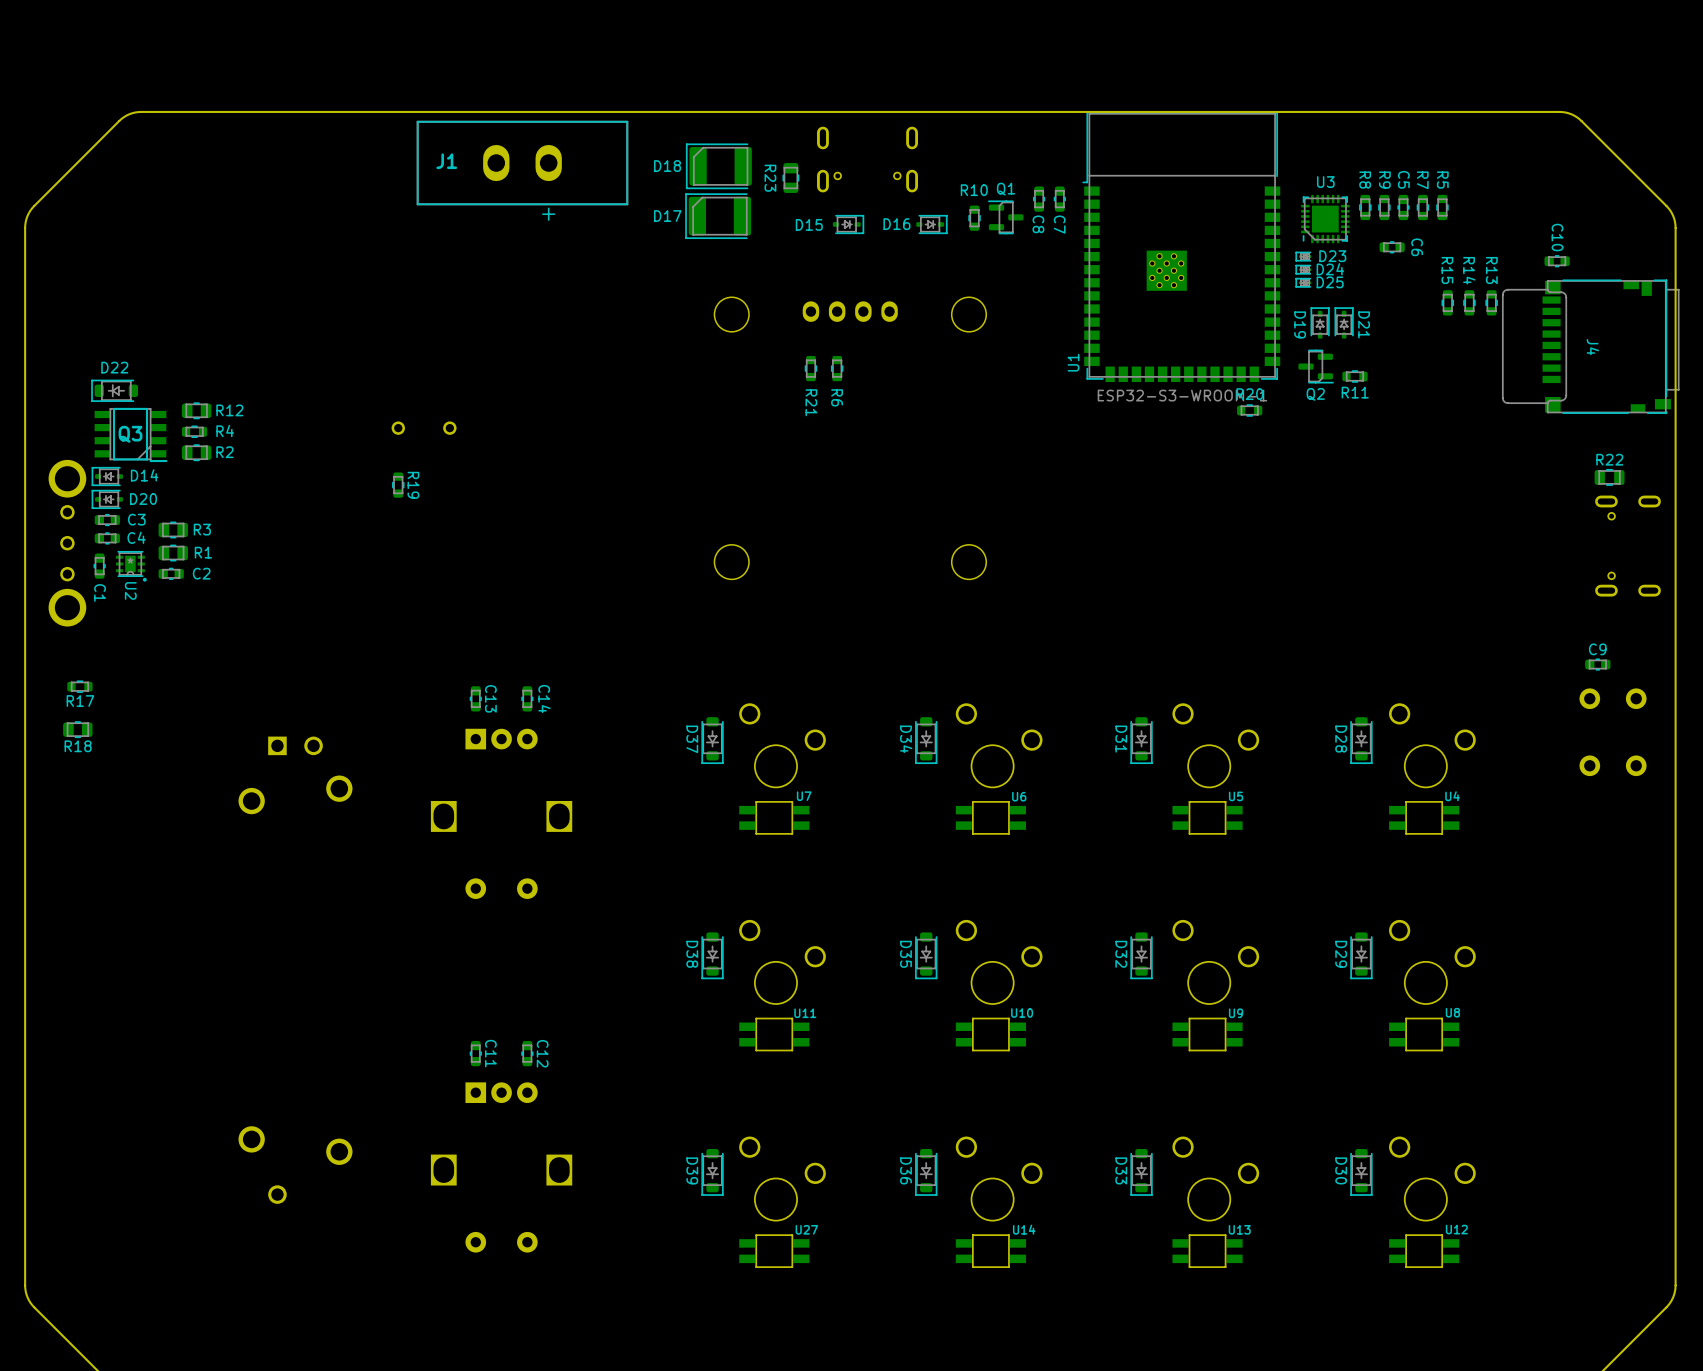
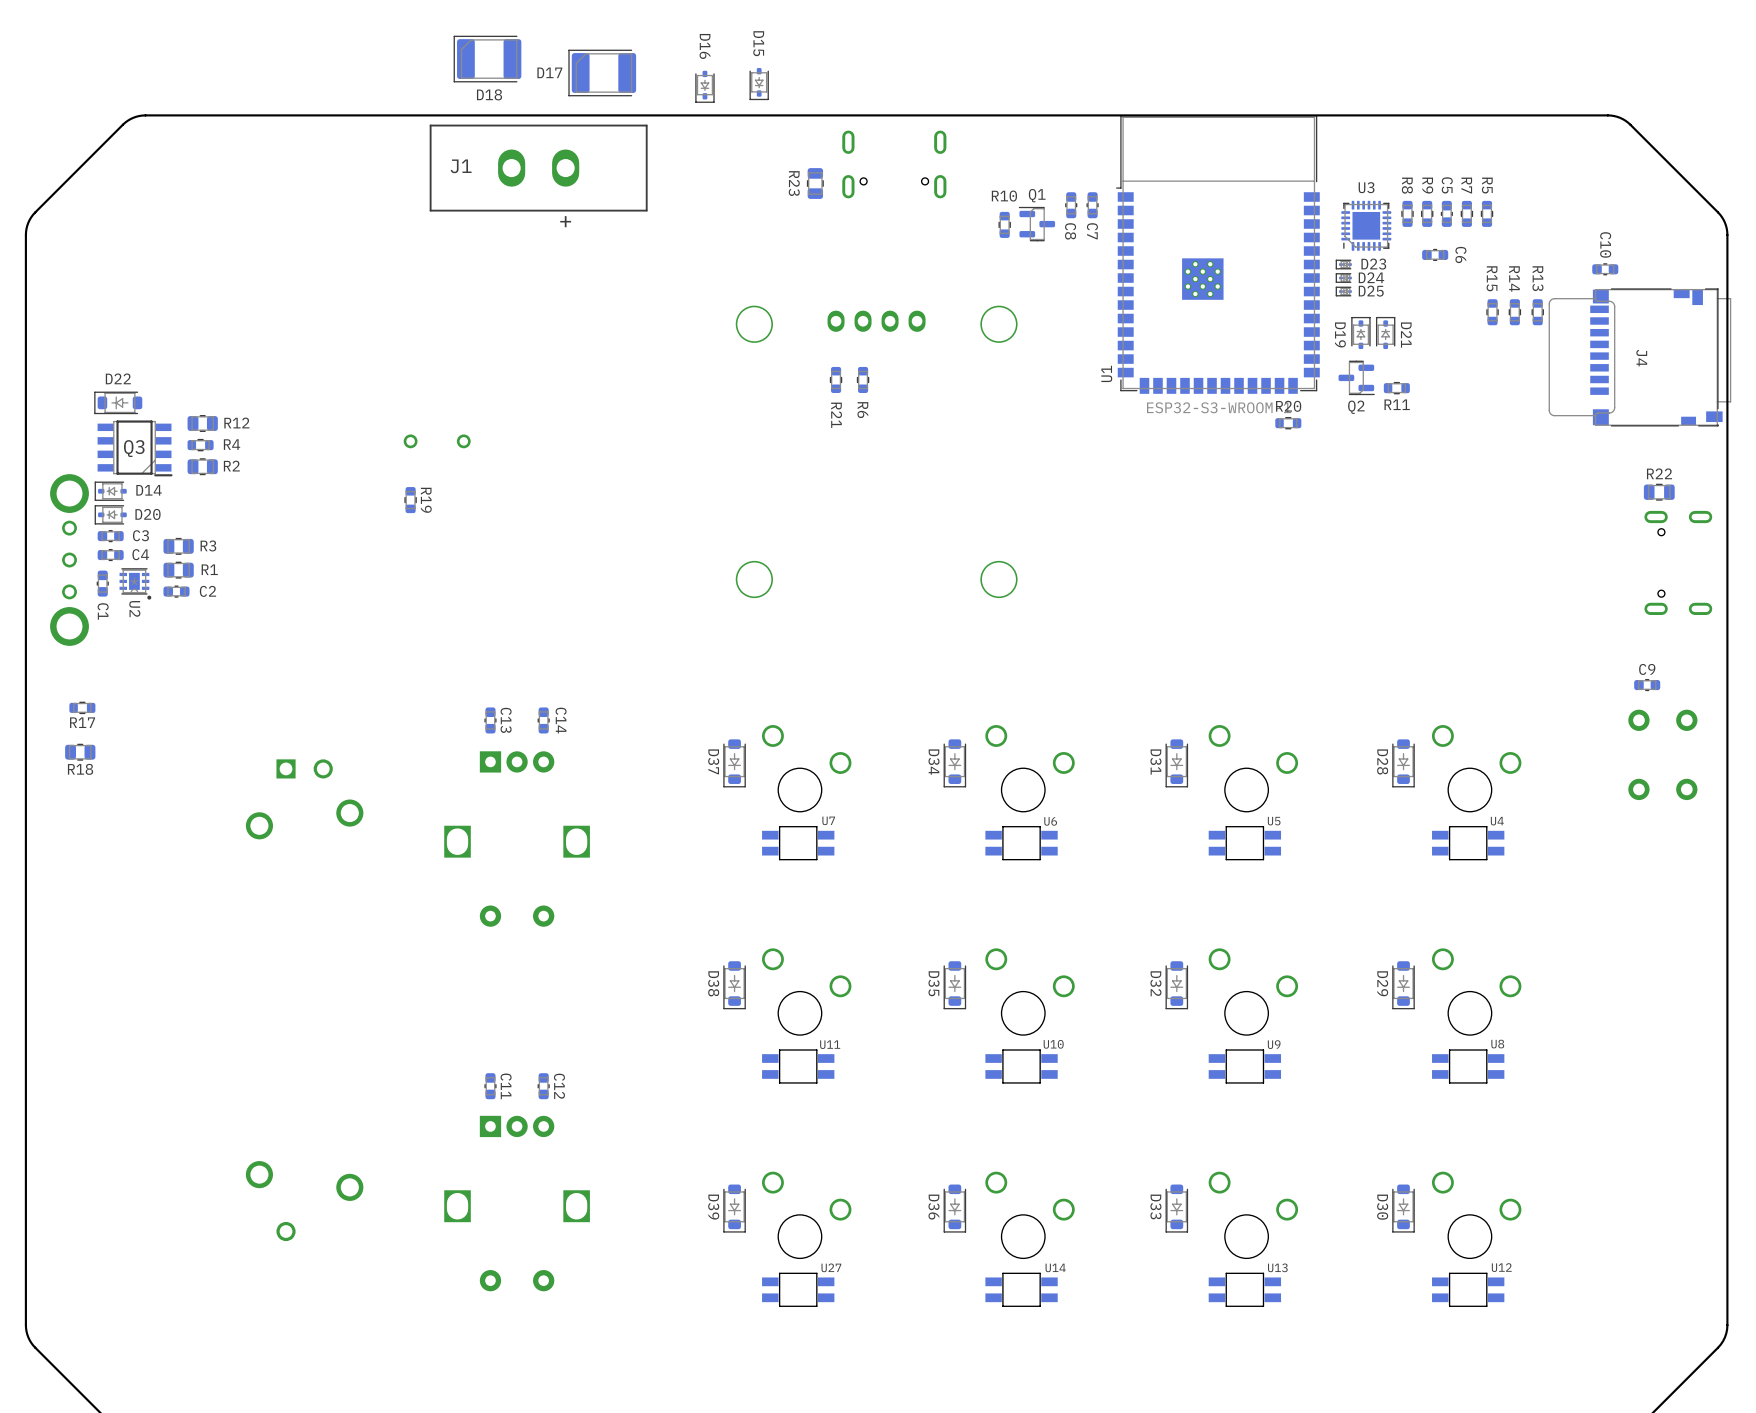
D18 name position: D18 (667, 166) -> D18 (489, 94)
D18 position: (718, 166) -> (487, 59)
D17 position: (718, 216) -> (602, 72)
D15 rotation: 0° (848, 224) -> 90° clockwise (759, 84)
D15 position: (848, 224) -> (759, 84)
D16 rotation: 0° (931, 224) -> 90° clockwise (704, 86)
D16 position: (931, 224) -> (704, 86)

